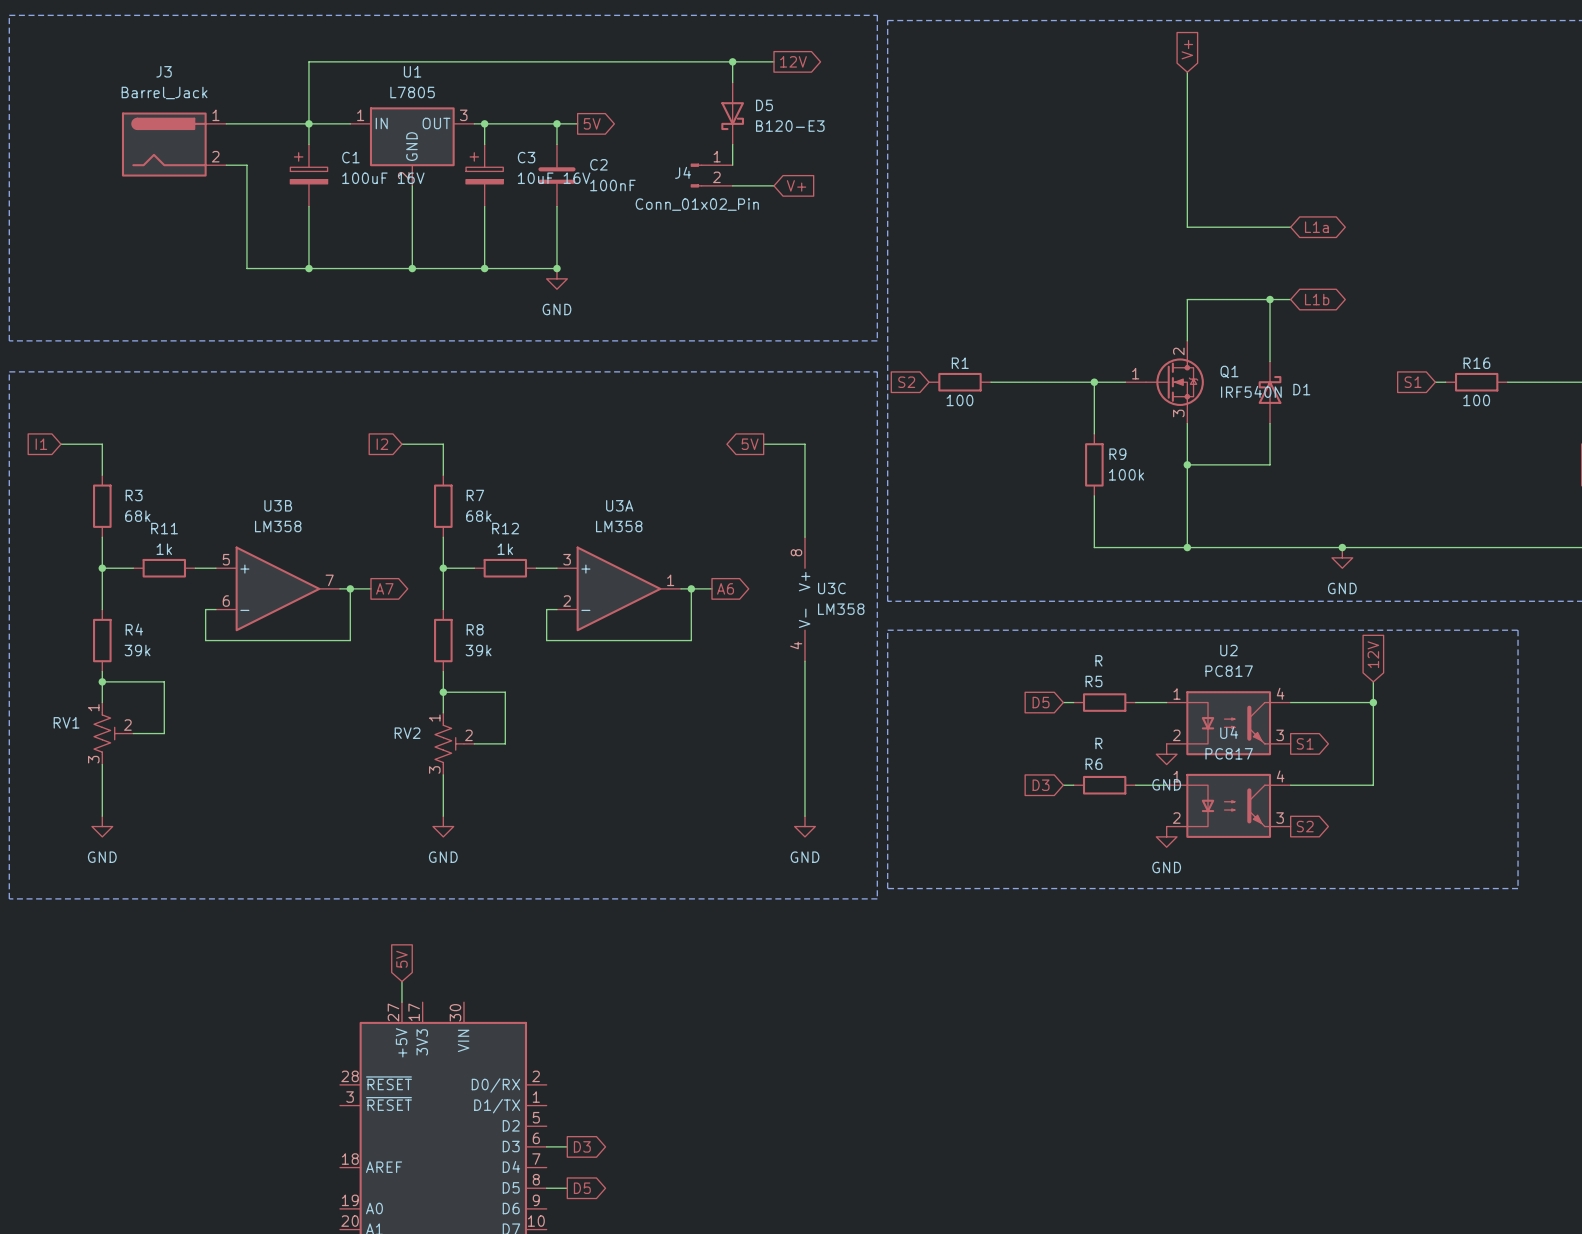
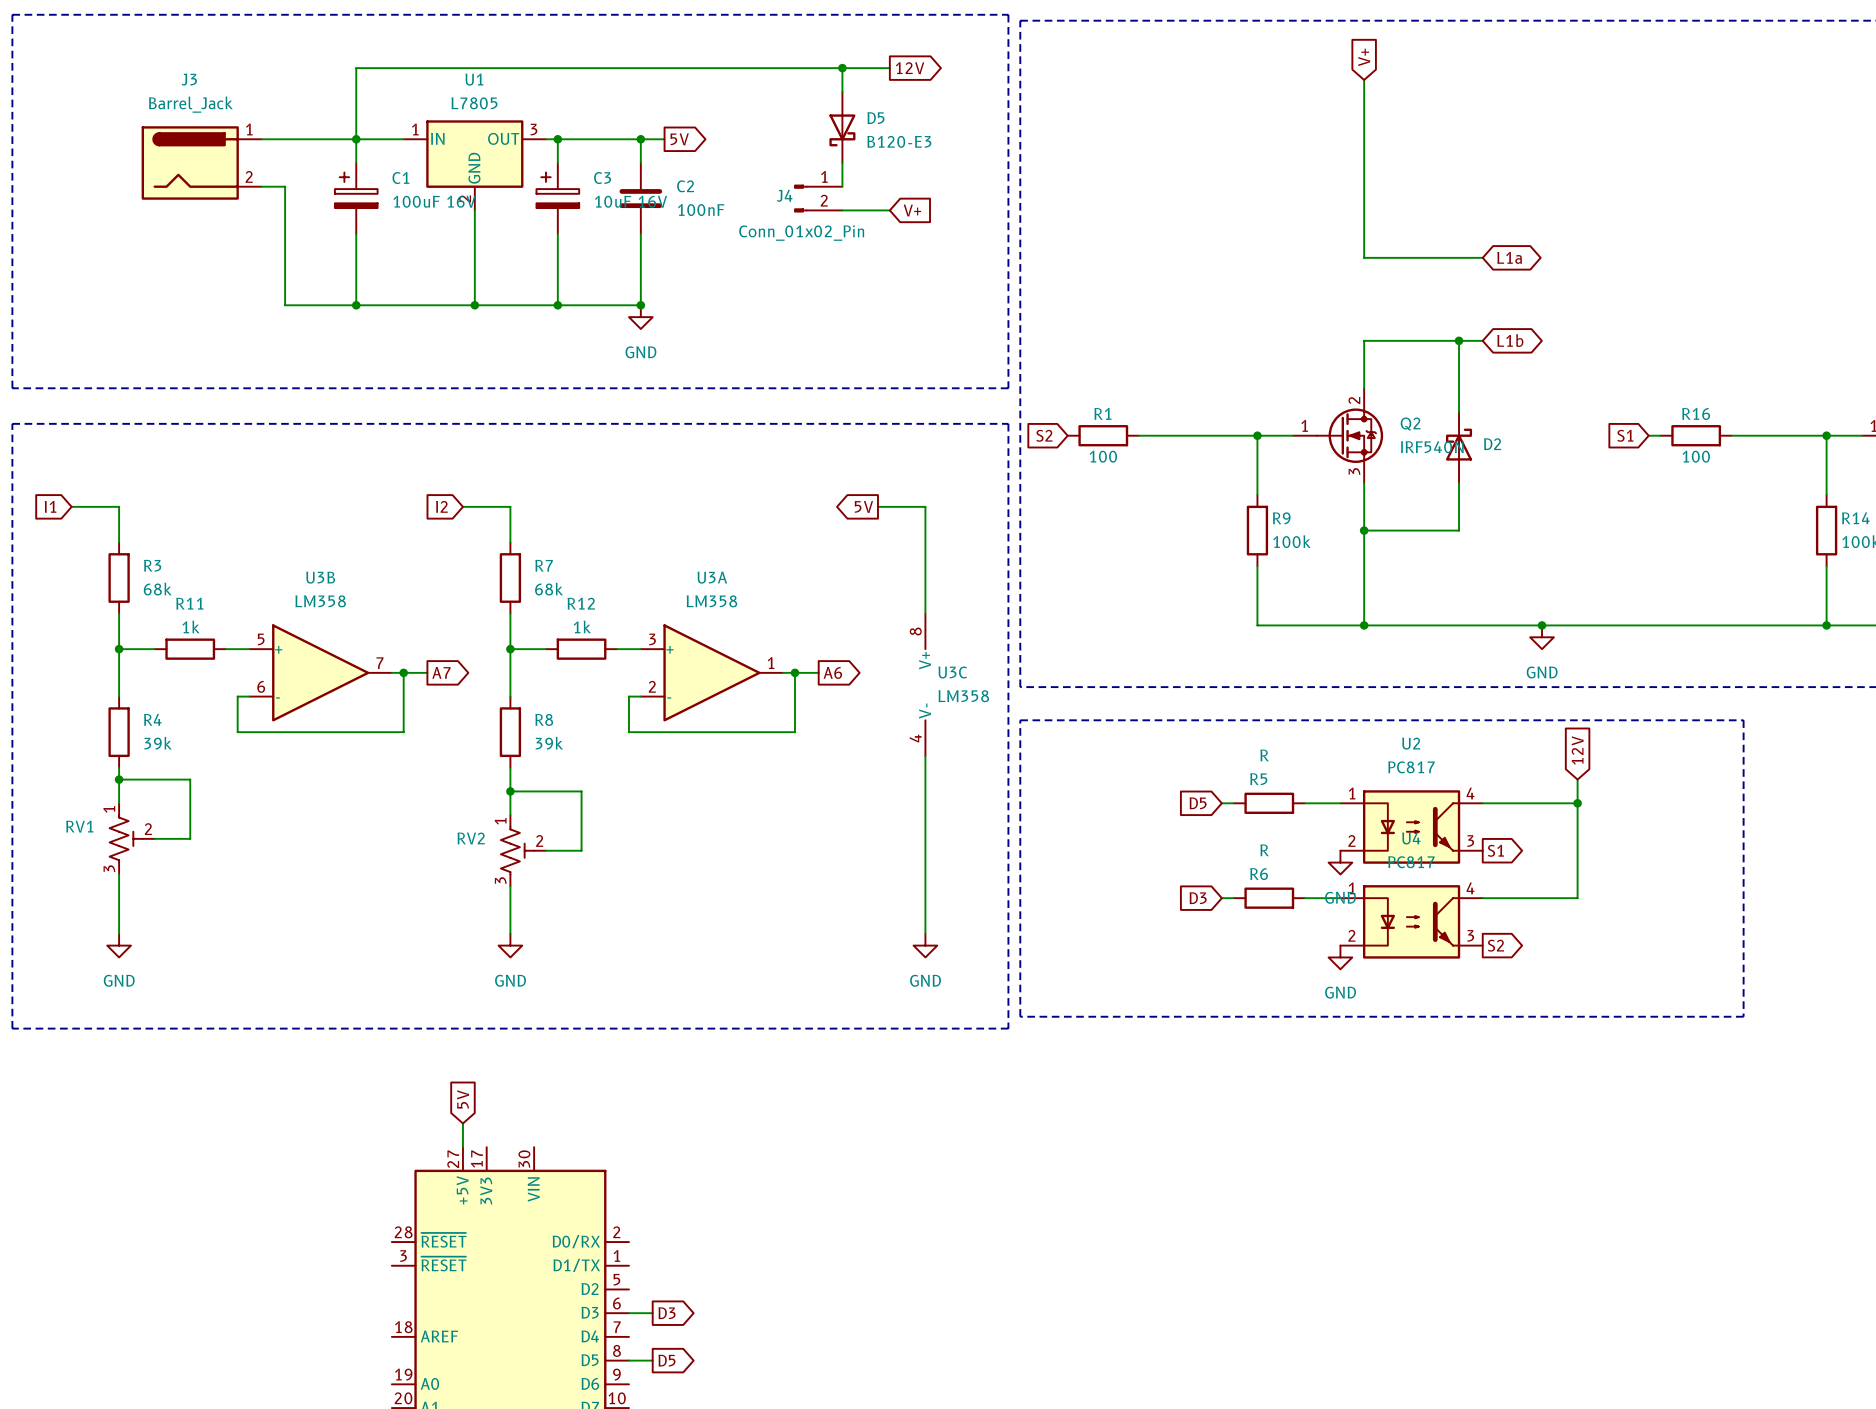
Q1 name: Q1 (1229, 371) -> Q2 (1410, 423)
D1 name: D1 (1301, 389) -> D2 (1492, 444)

